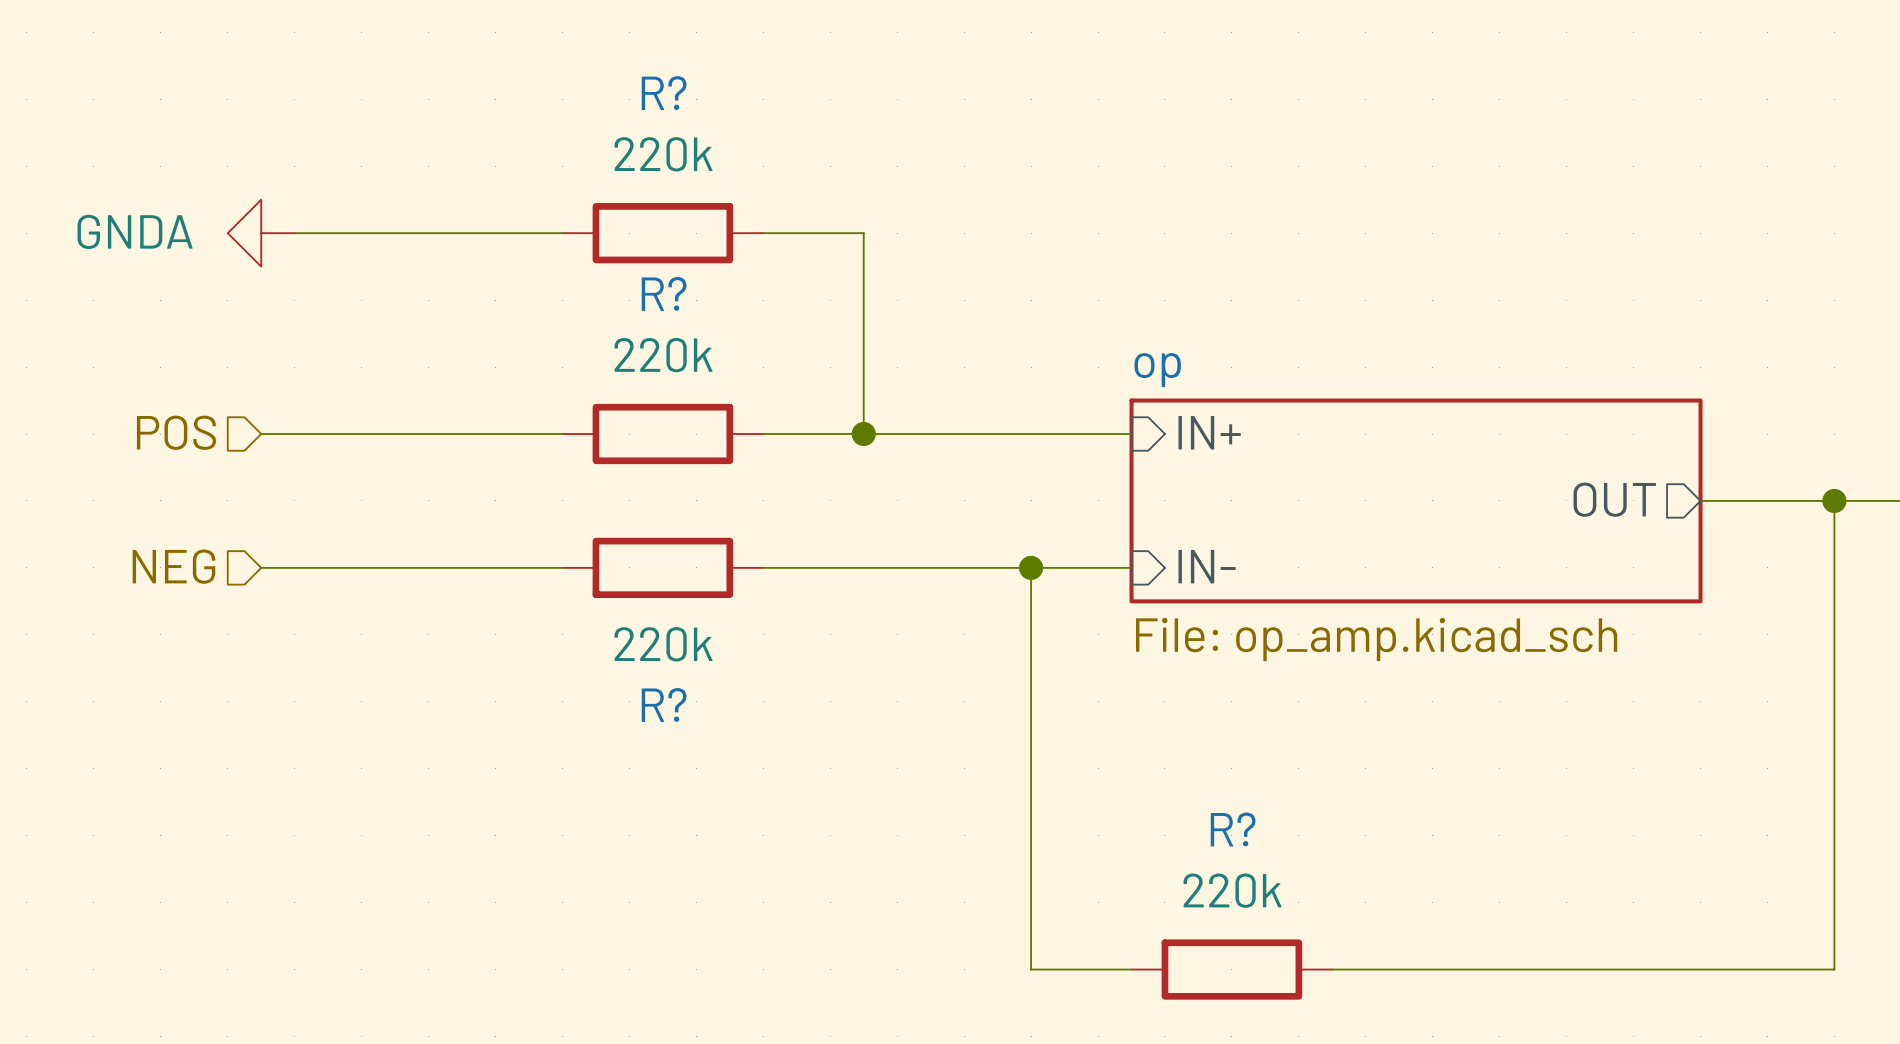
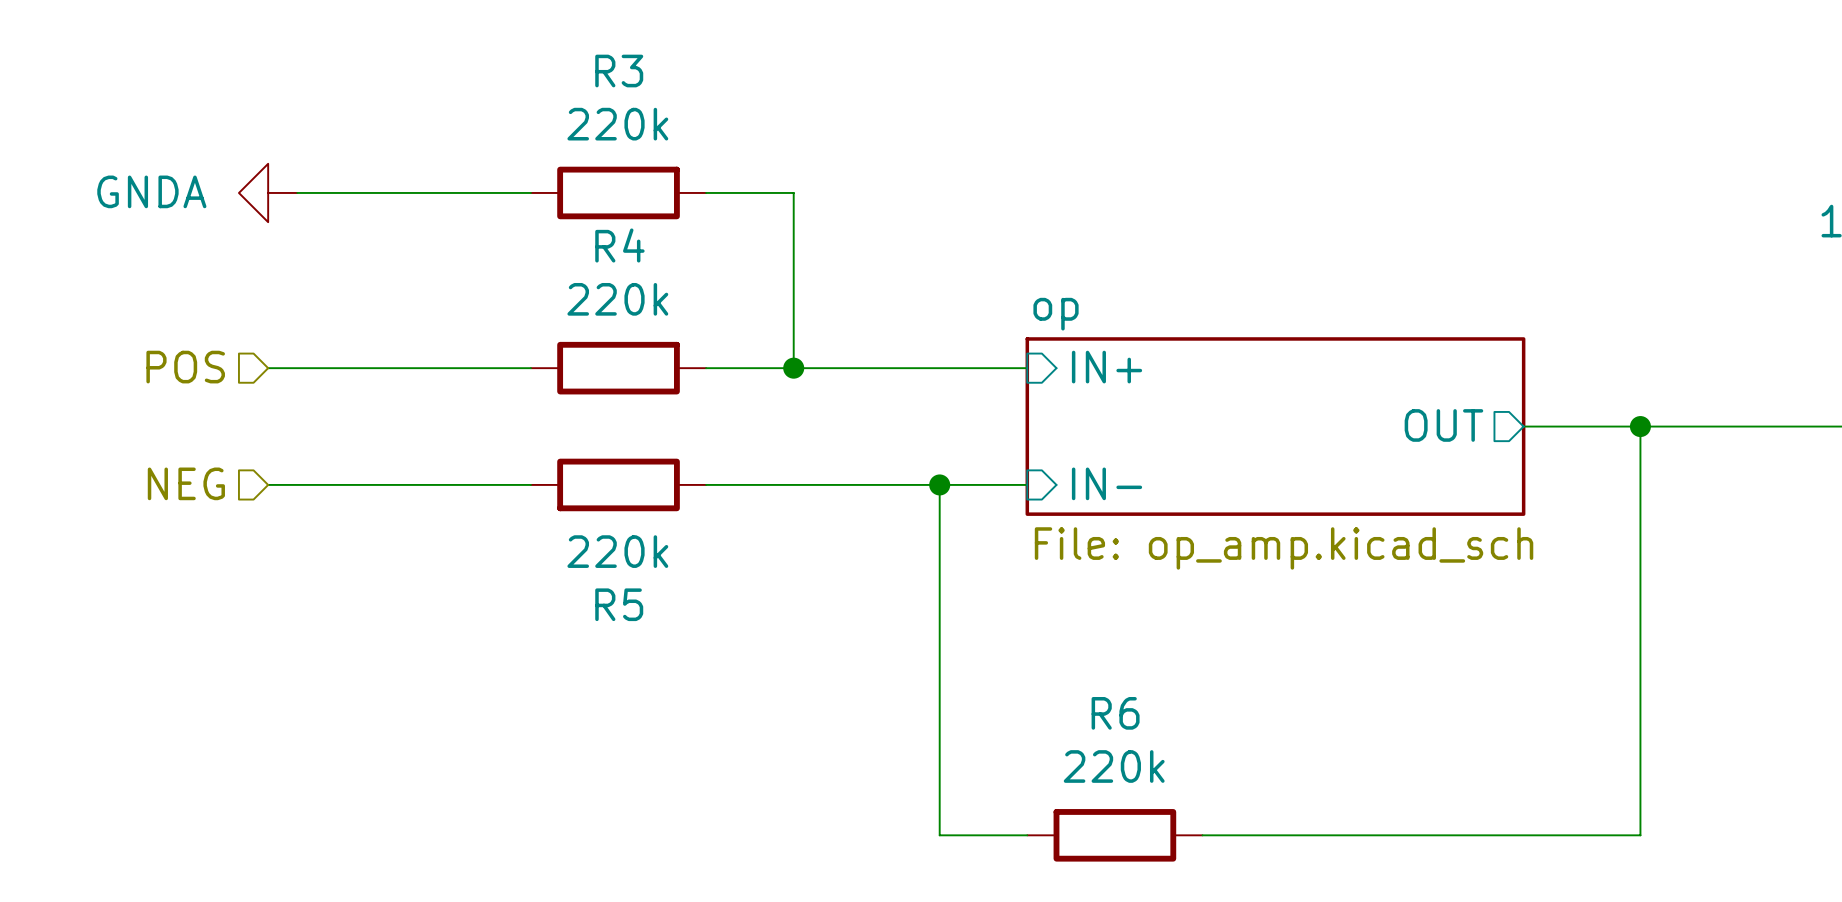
R? name: R? (664, 93) -> R3 (619, 71)
R? name: R? (664, 293) -> R4 (619, 245)
R? name: R? (664, 704) -> R5 (619, 604)
R? name: R? (1233, 829) -> R6 (1115, 713)

